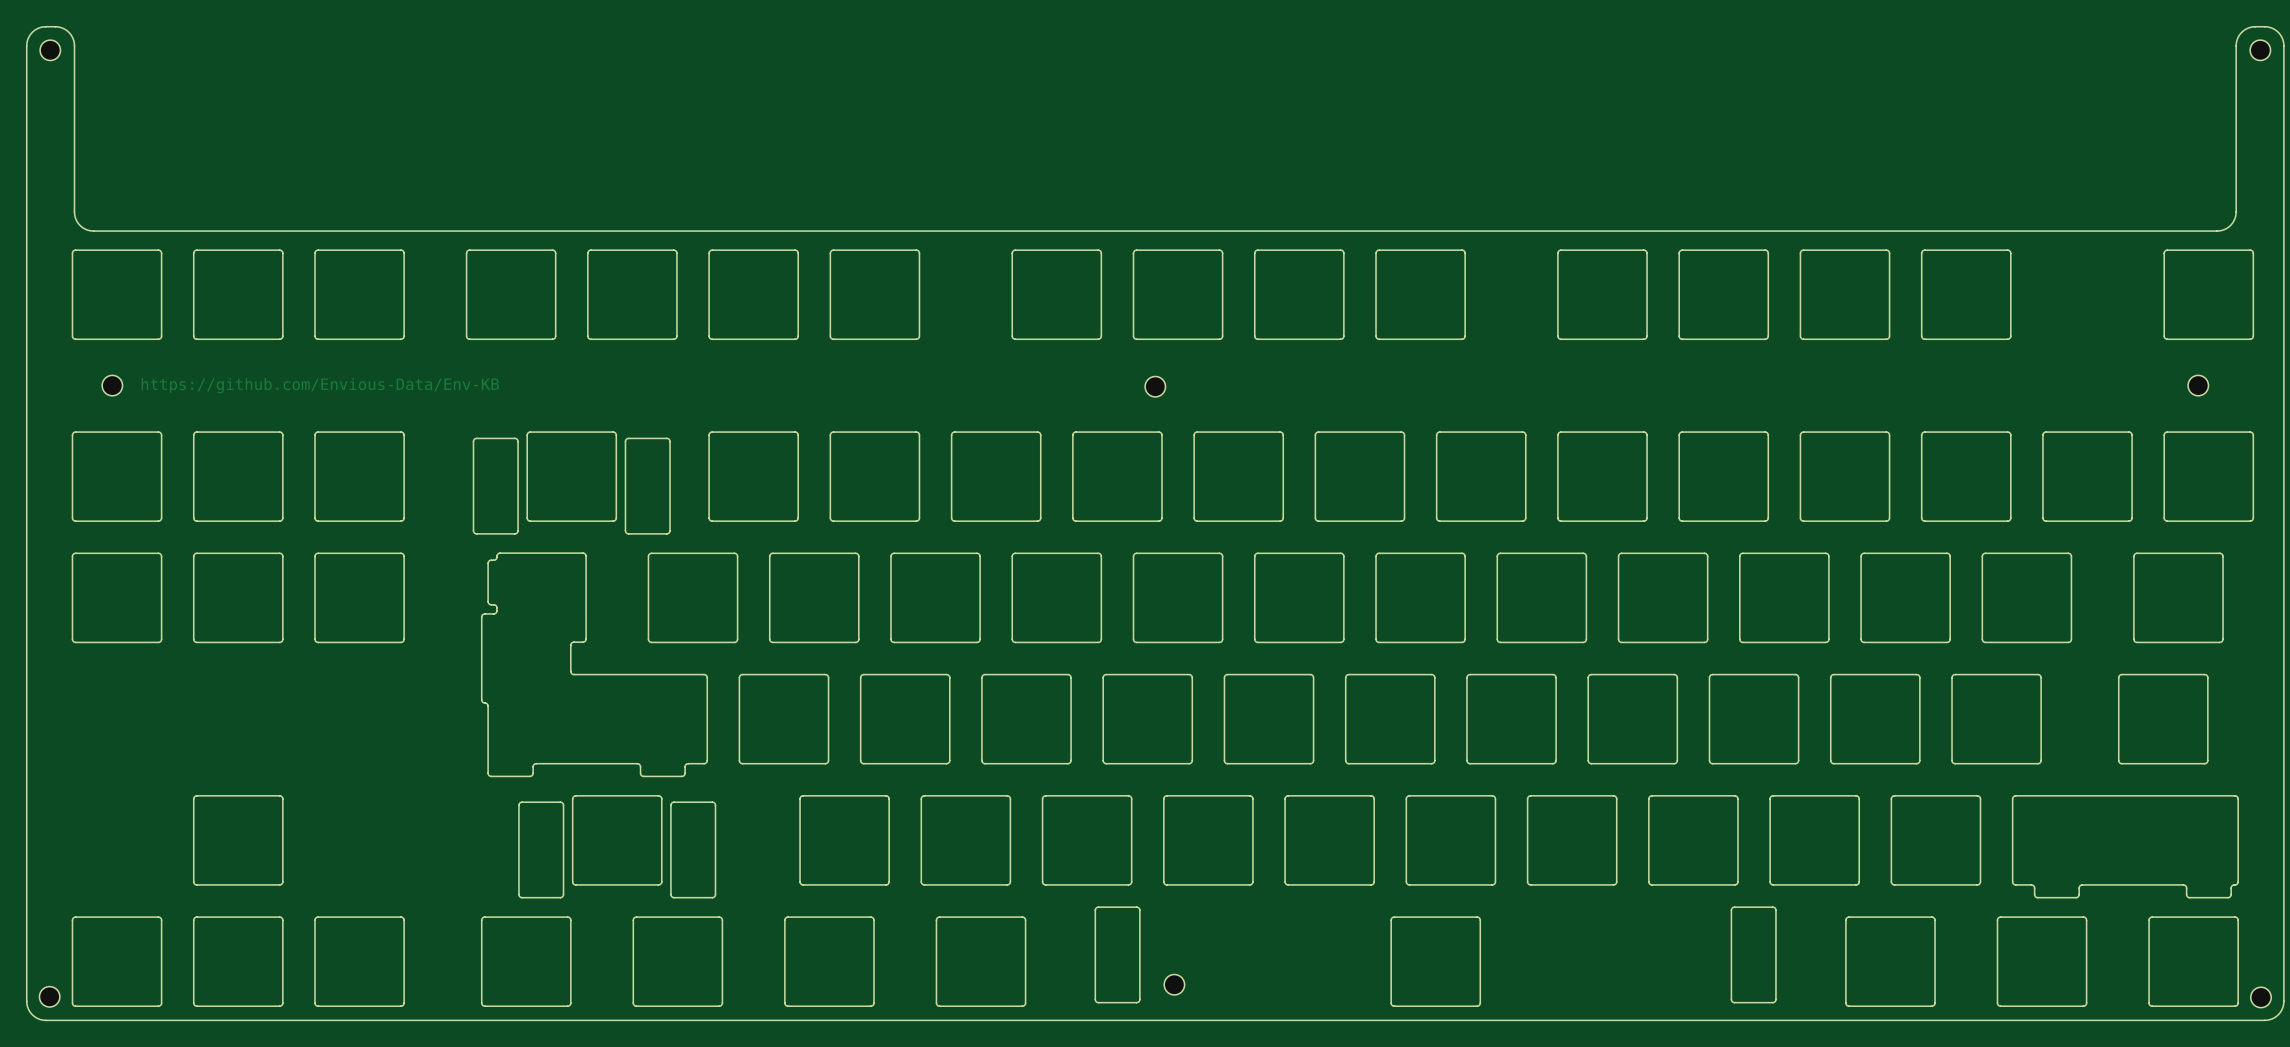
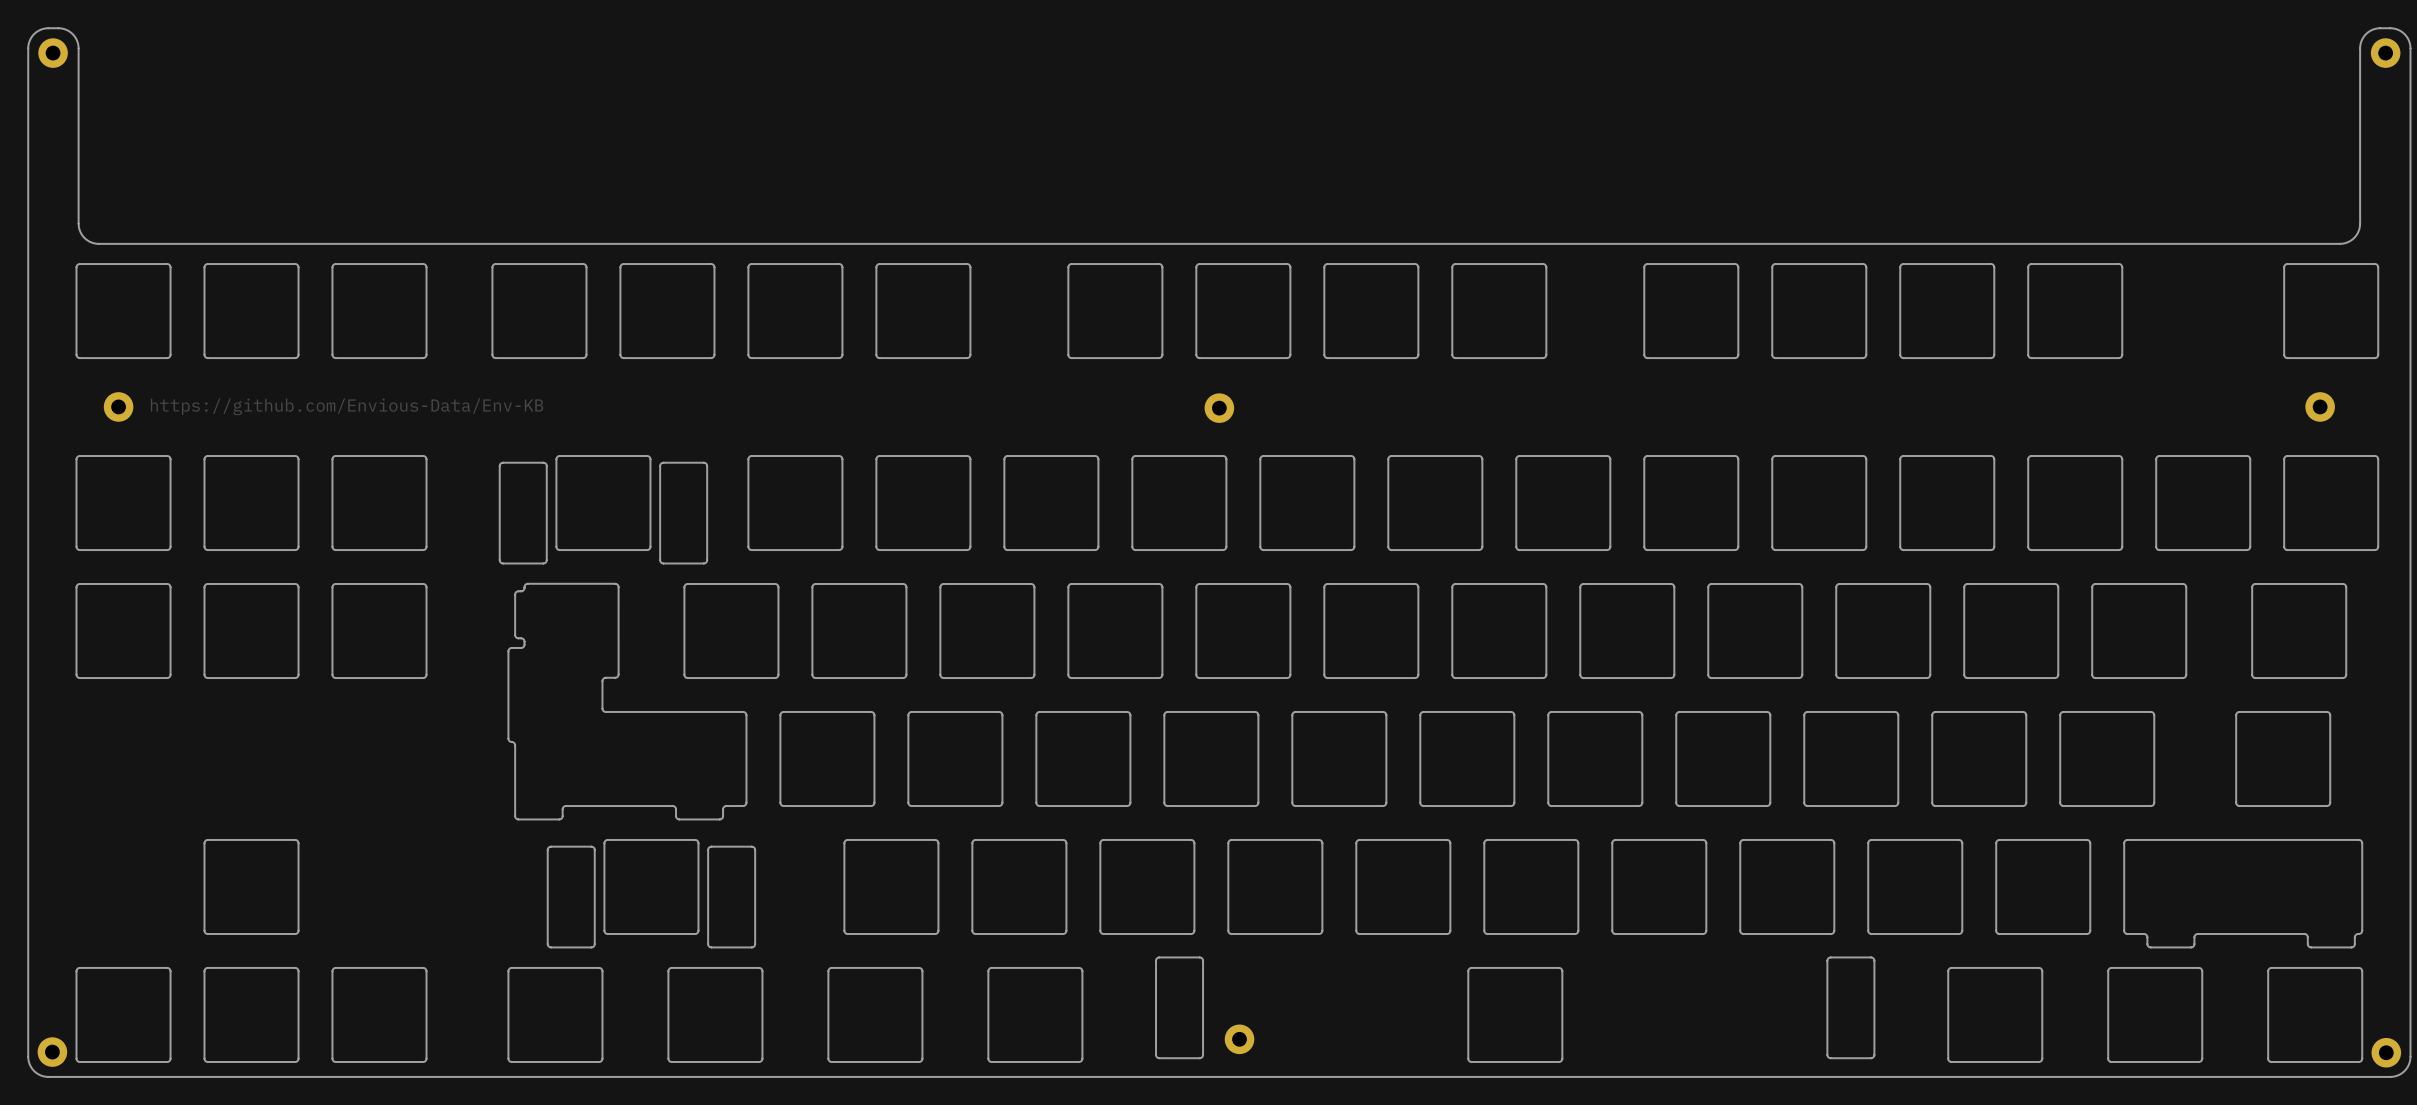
part footprint: [40, 40, 61, 61] -> [38, 38, 68, 68]
part footprint: [2250, 40, 2271, 61] -> [2370, 38, 2401, 68]
part footprint: [102, 375, 123, 396] -> [103, 392, 134, 422]
part footprint: [2188, 375, 2209, 396] -> [2305, 392, 2335, 422]
part footprint: [1145, 376, 1166, 397] -> [1204, 393, 1235, 423]
part footprint: [1164, 974, 1185, 995] -> [1224, 1024, 1255, 1055]
part footprint: [39, 986, 60, 1008] -> [37, 1037, 68, 1067]
part footprint: [2250, 987, 2272, 1008] -> [2371, 1037, 2402, 1068]

